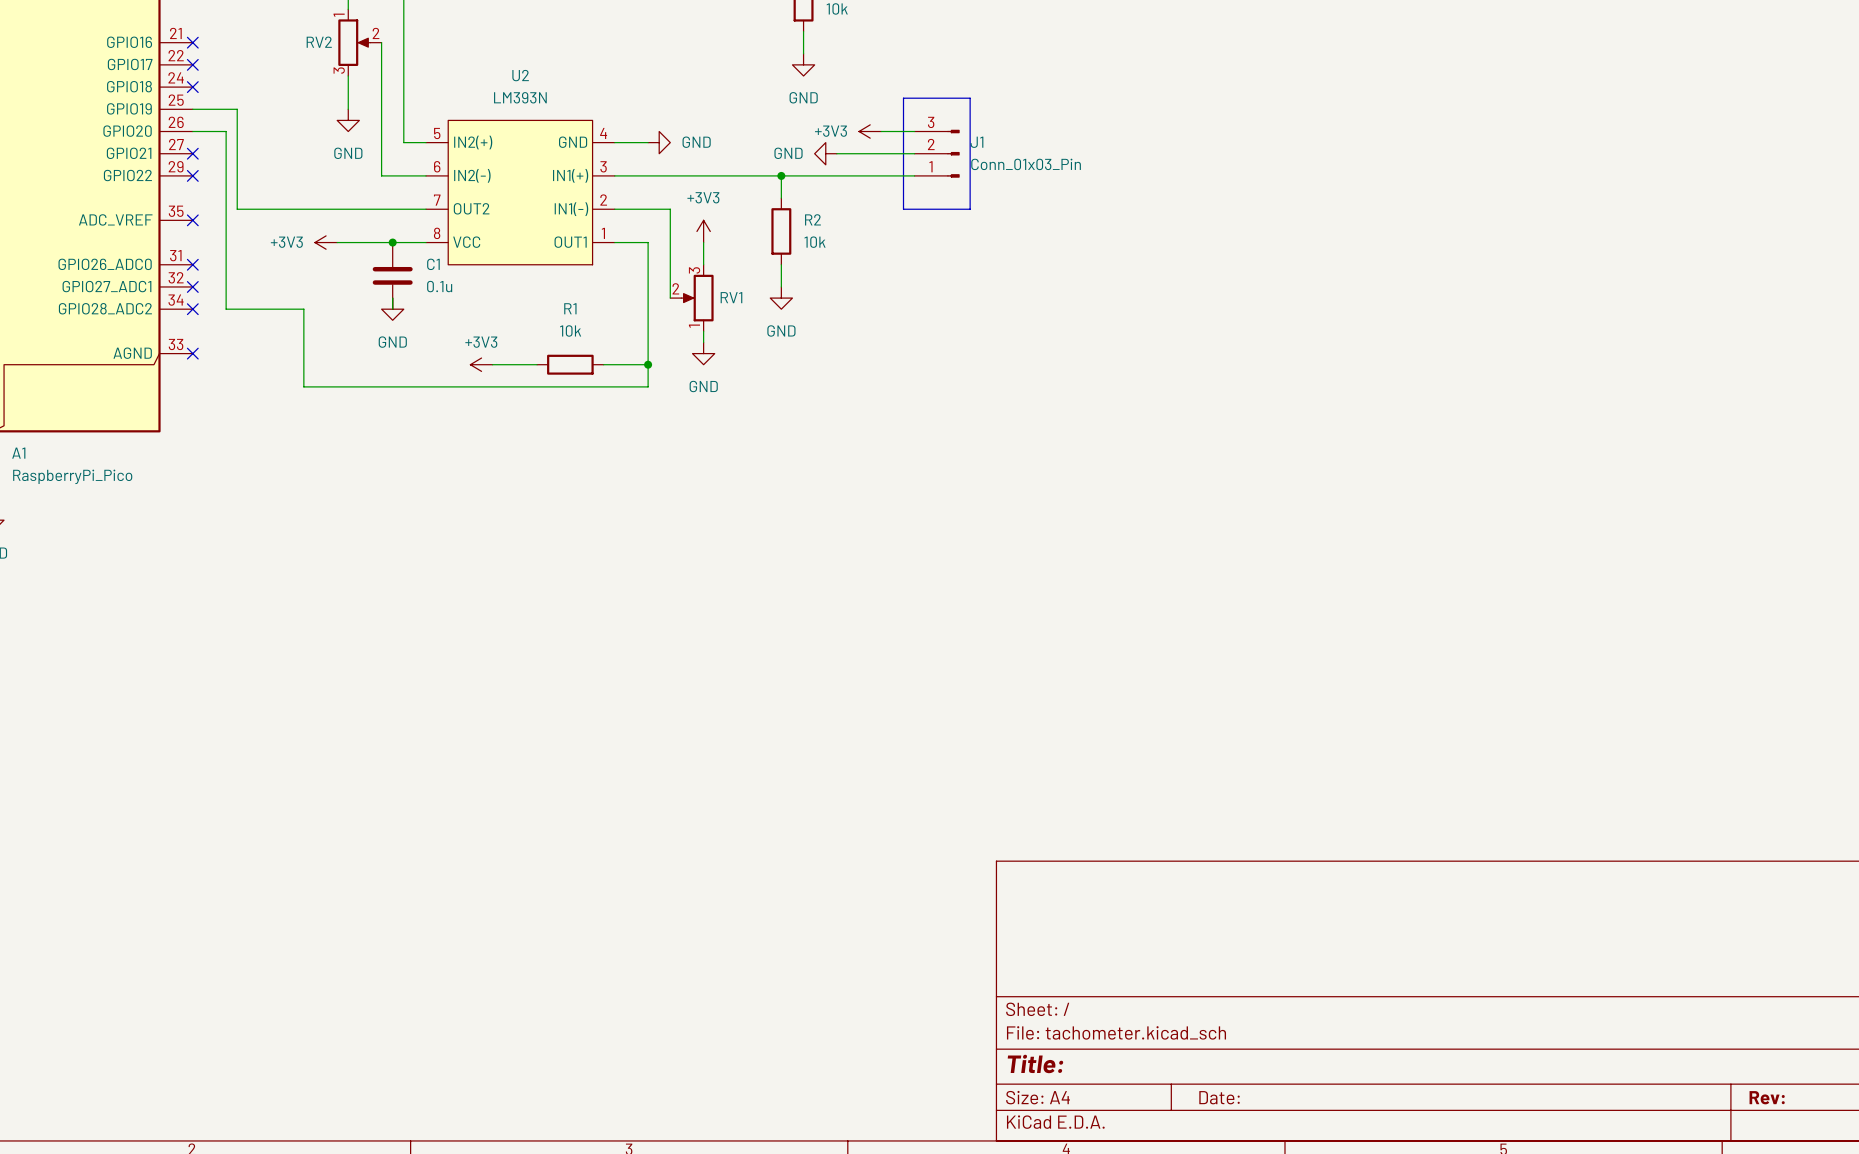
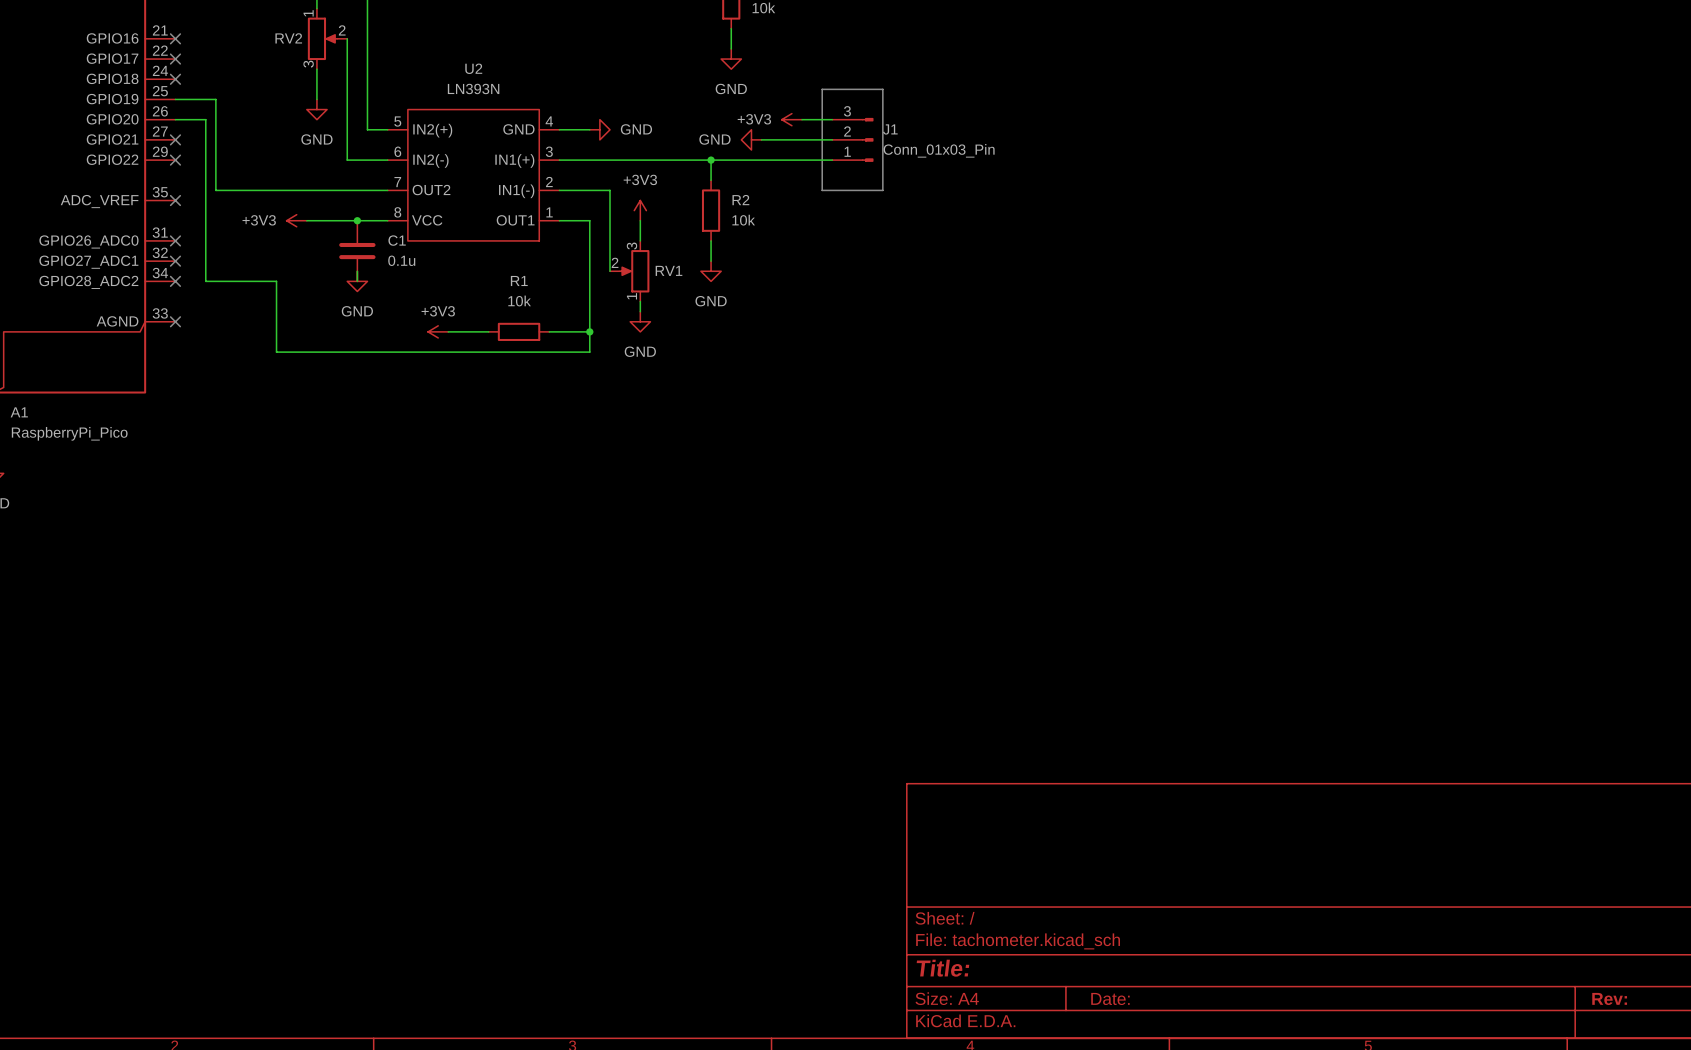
U2 value: LM393N (520, 97) -> LN393N (473, 88)

